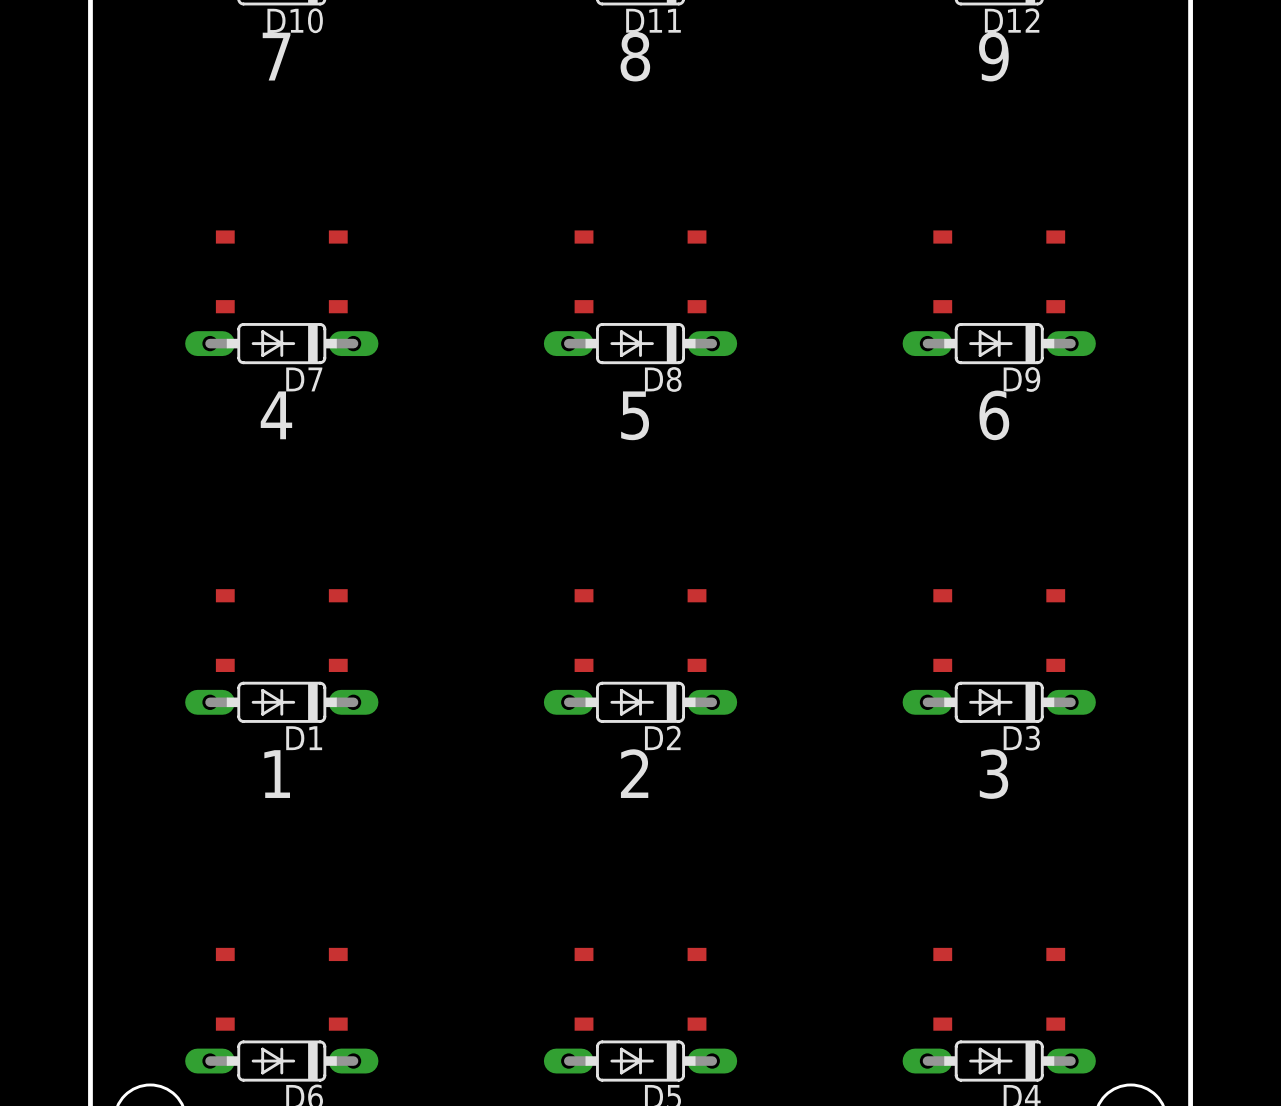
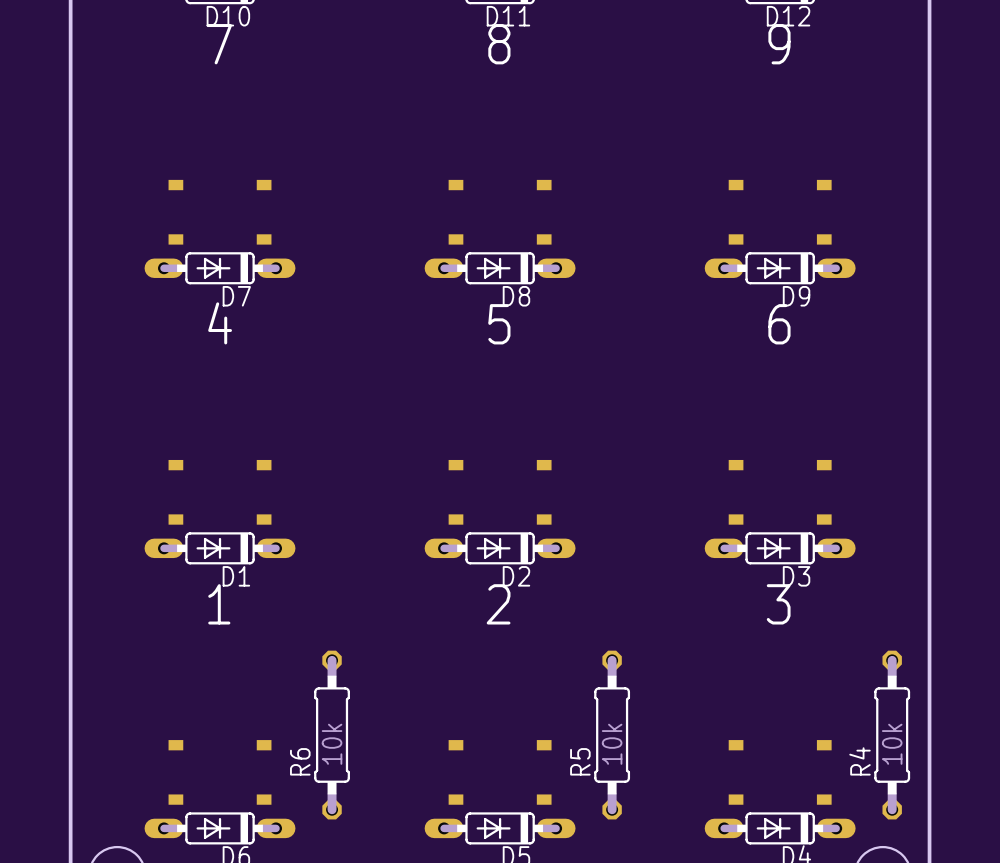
R6: none -> 10k (332, 735)
R5: none -> 10k (612, 735)
R4: none -> 10k (892, 735)

